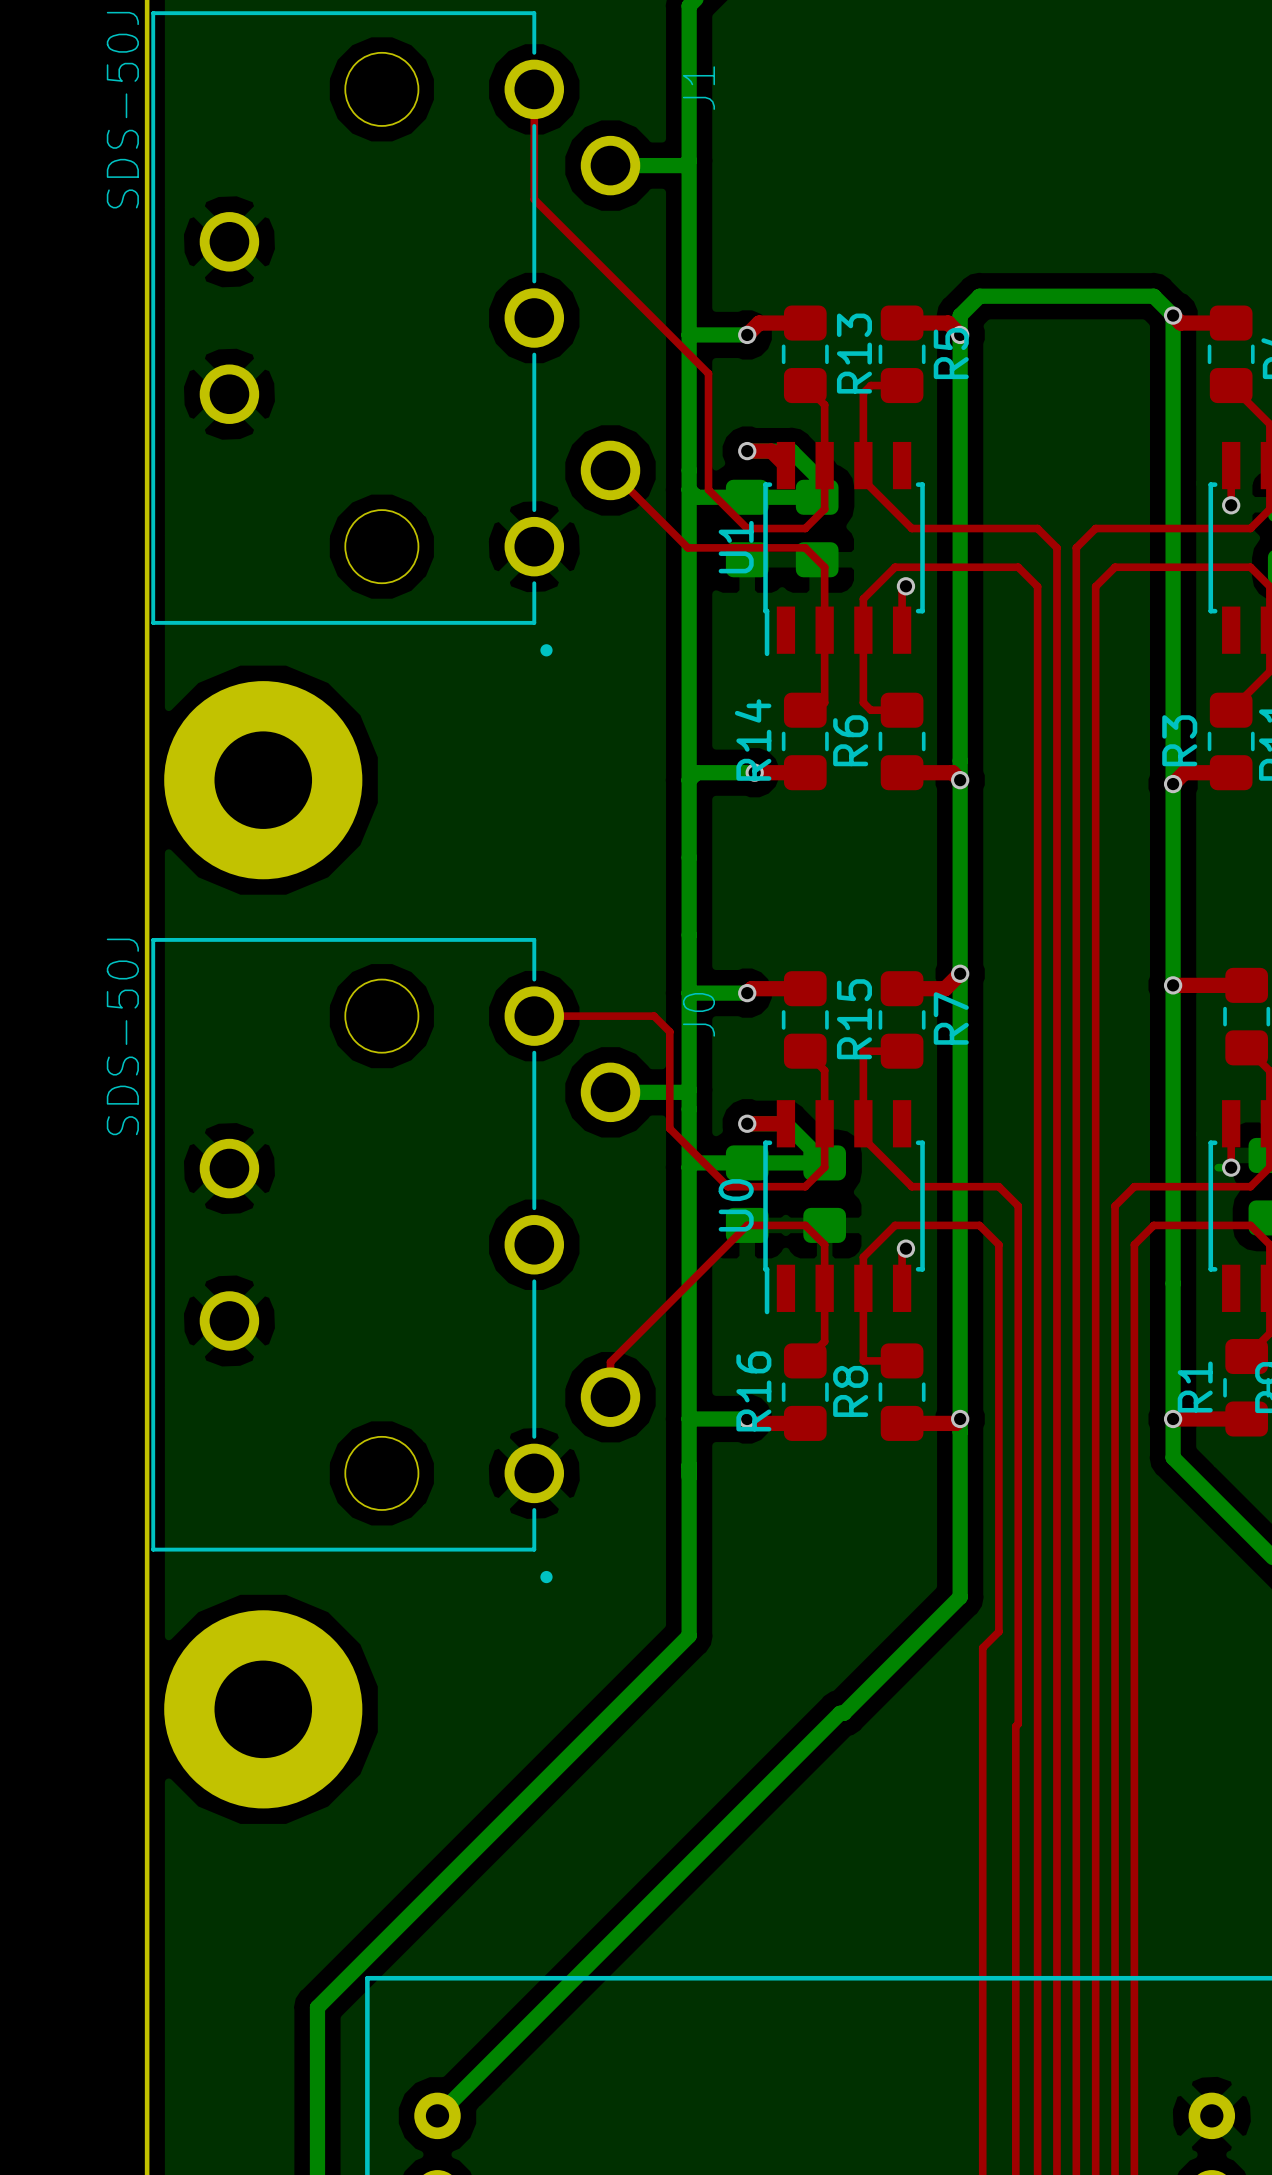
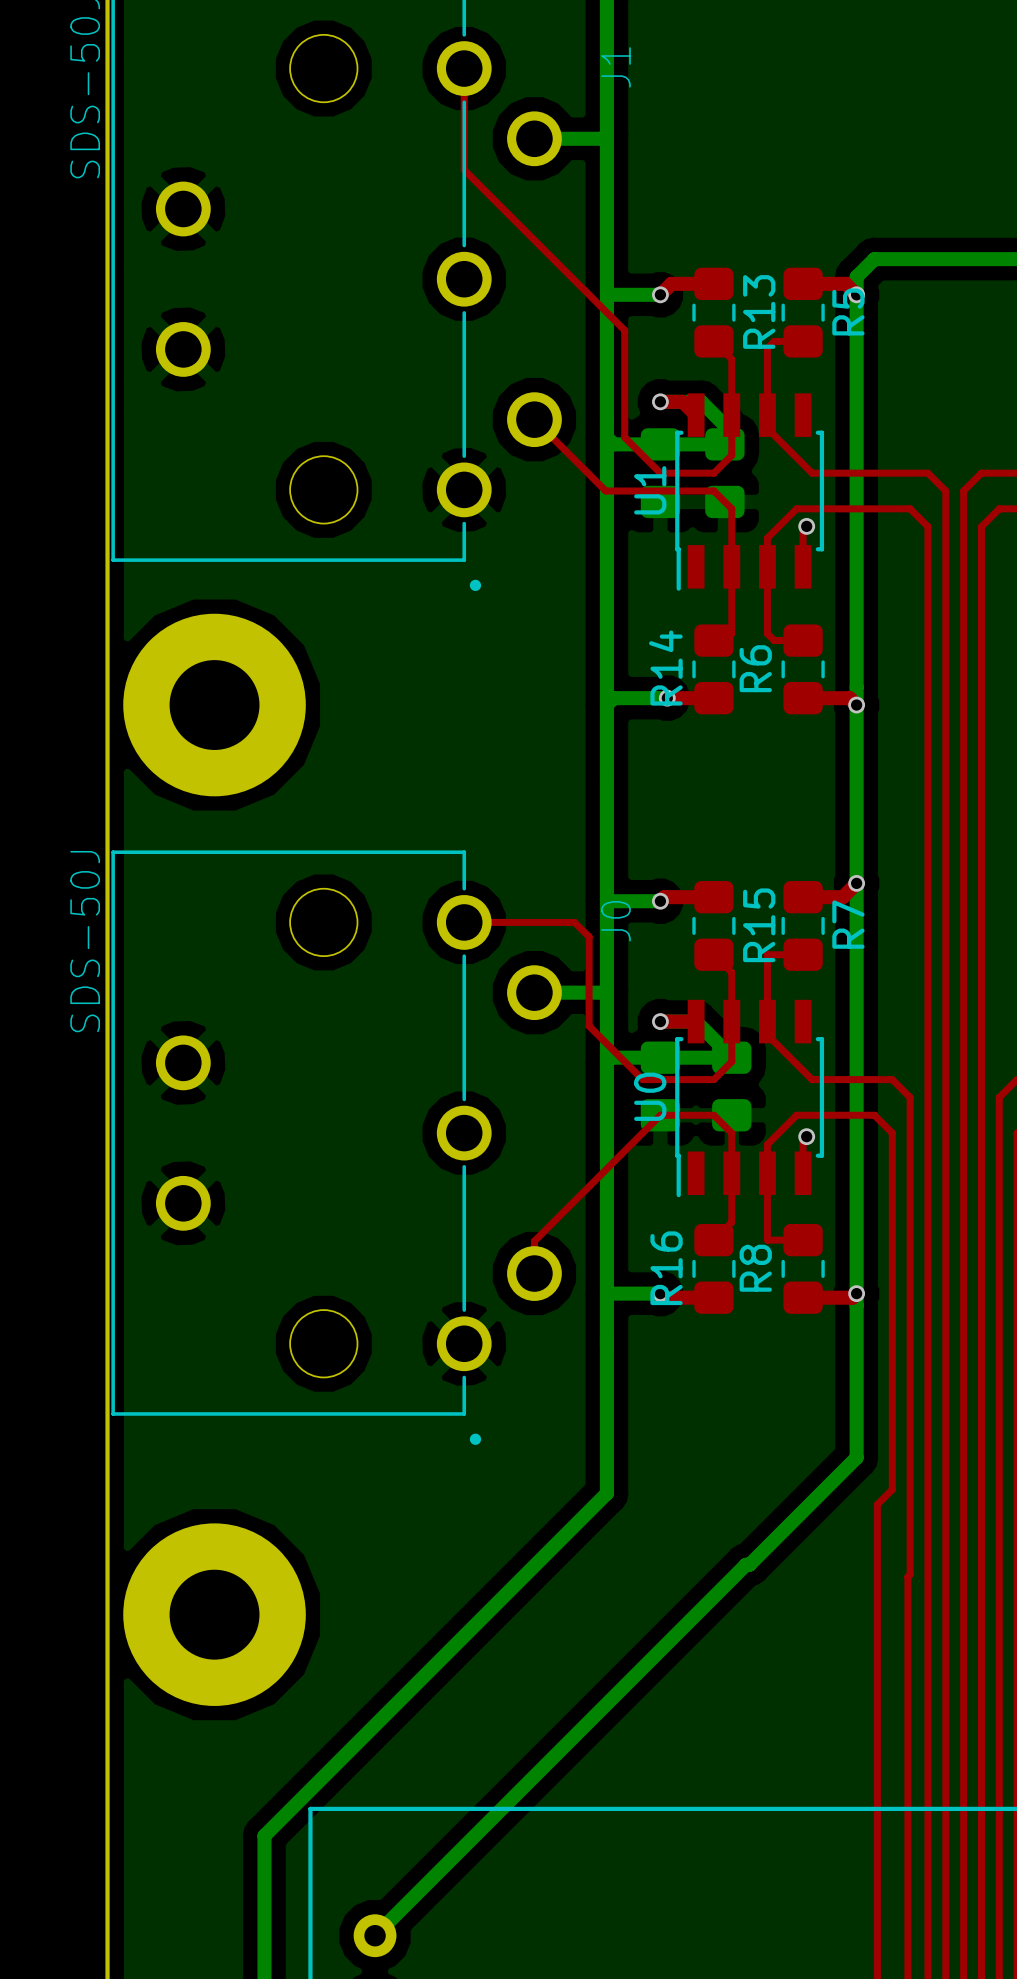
part position: (263, 1709) -> (214, 1614)

